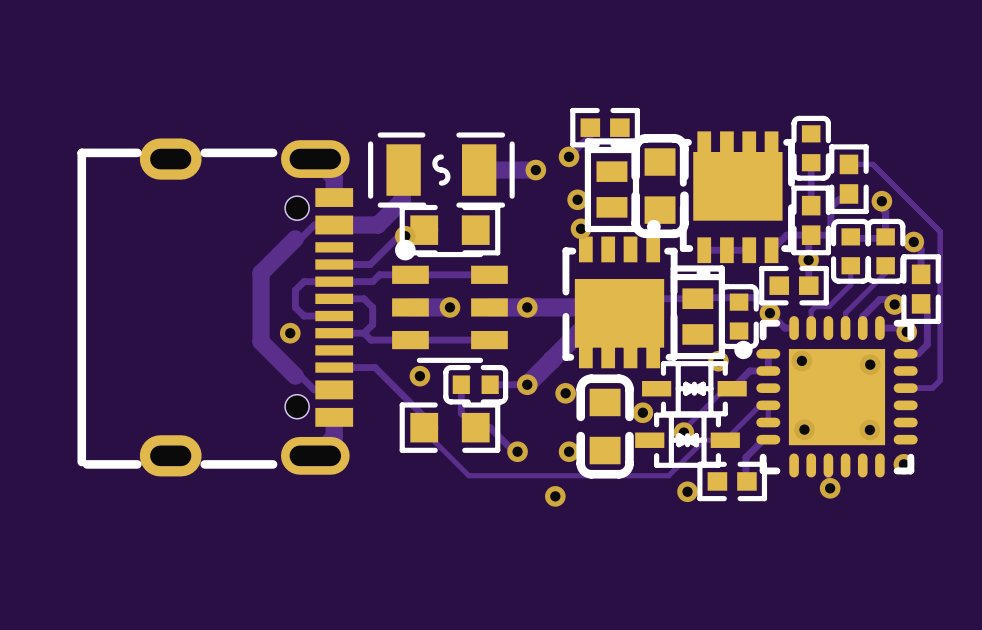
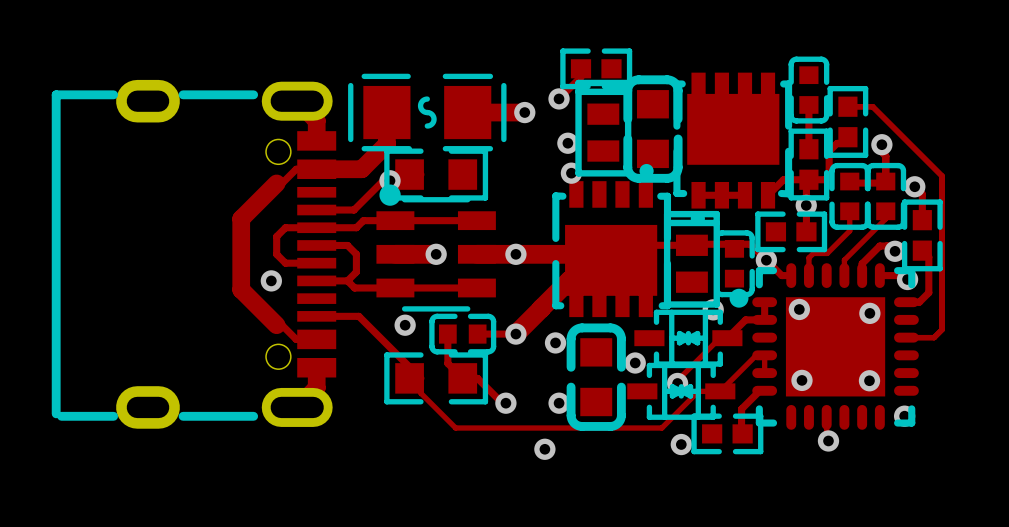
part footprint: [368, 132, 515, 208] -> [348, 73, 507, 152]

